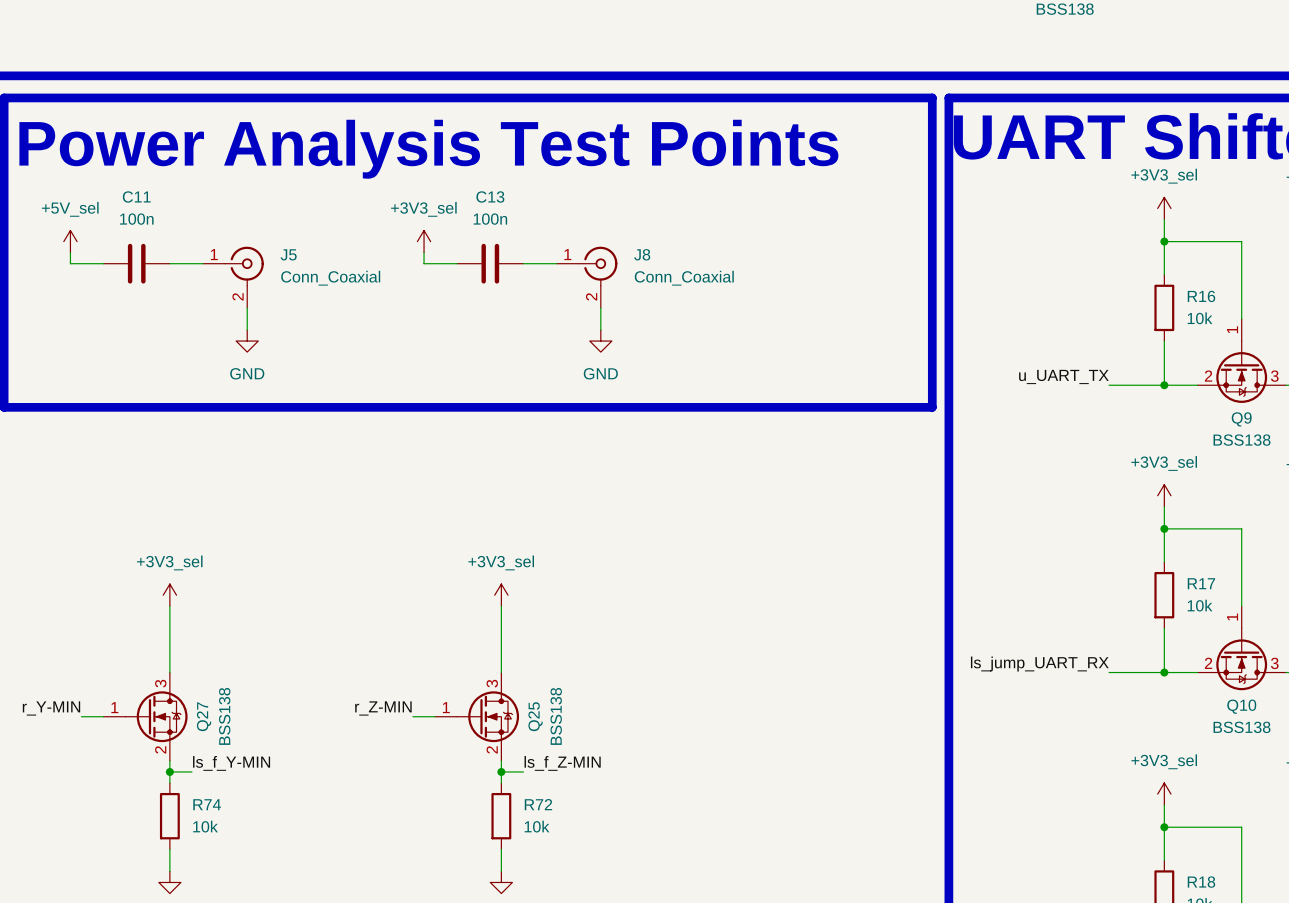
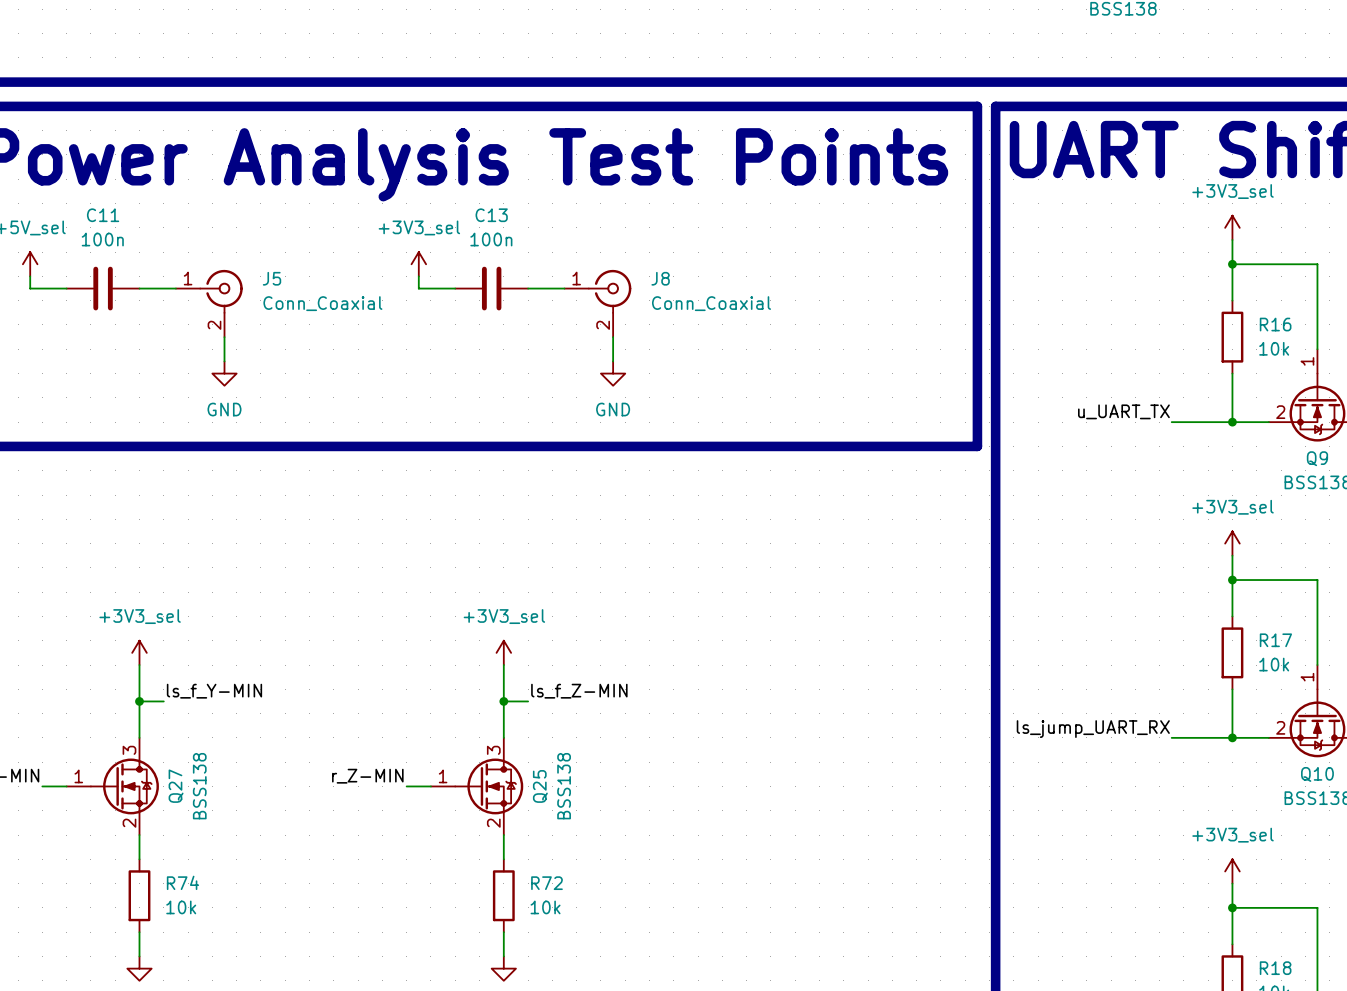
junction: none -> (139, 701)
junction: none -> (503, 701)
label position: ls_f_Y-MIN (231, 763) -> ls_f_Y-MIN (214, 691)
label position: ls_f_Z-MIN (562, 763) -> ls_f_Z-MIN (579, 691)
wire: (169, 771) (191, 771) -> (139, 701) (163, 701)
junction: (169, 771) -> none
wire: (501, 771) (523, 771) -> (503, 701) (528, 701)
junction: (501, 771) -> none

